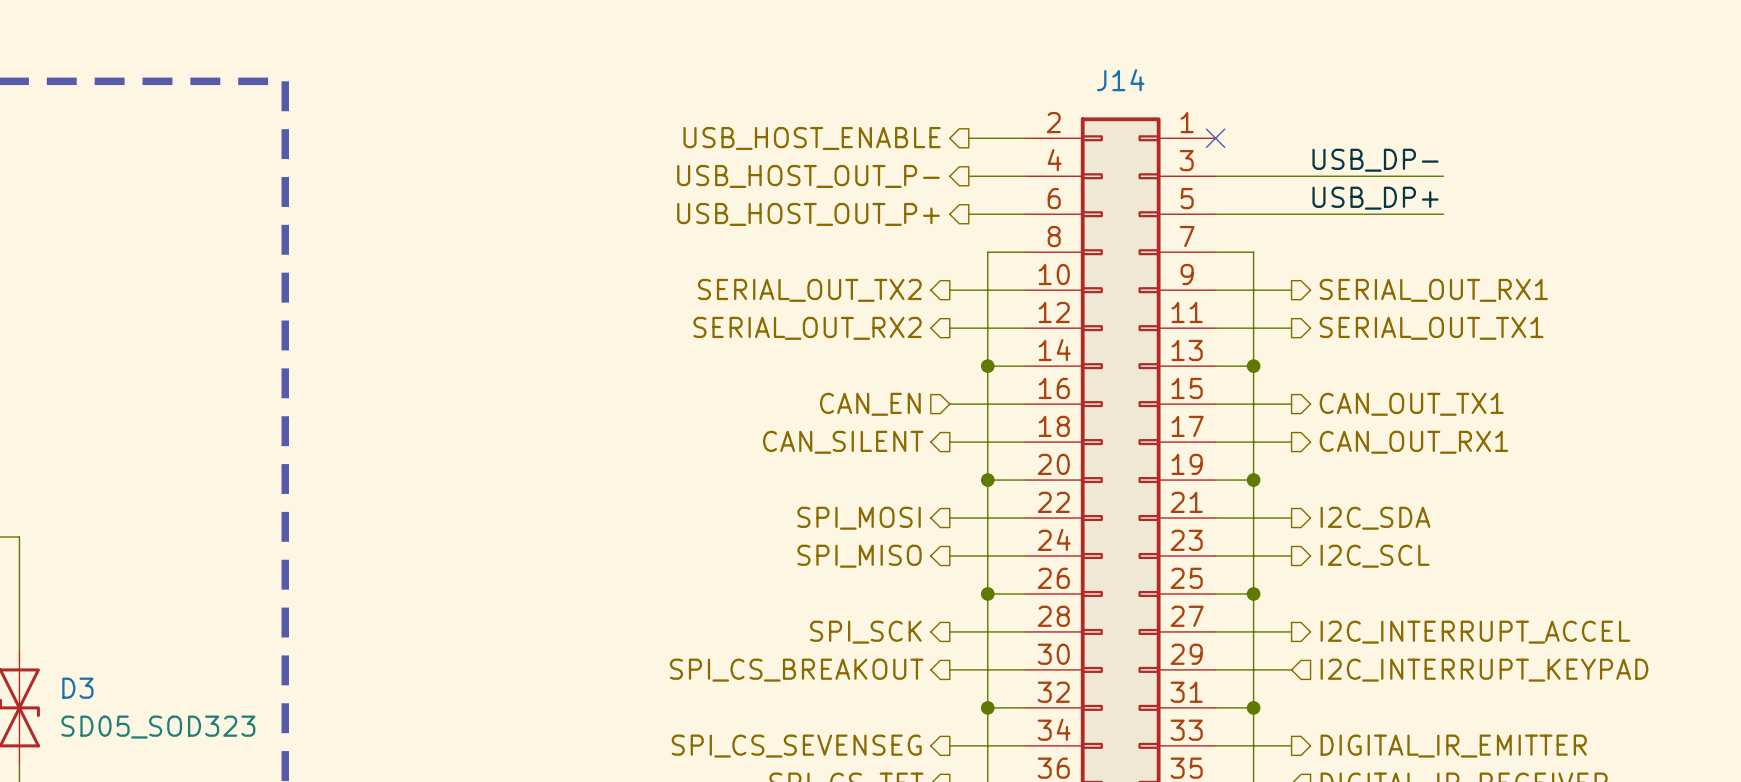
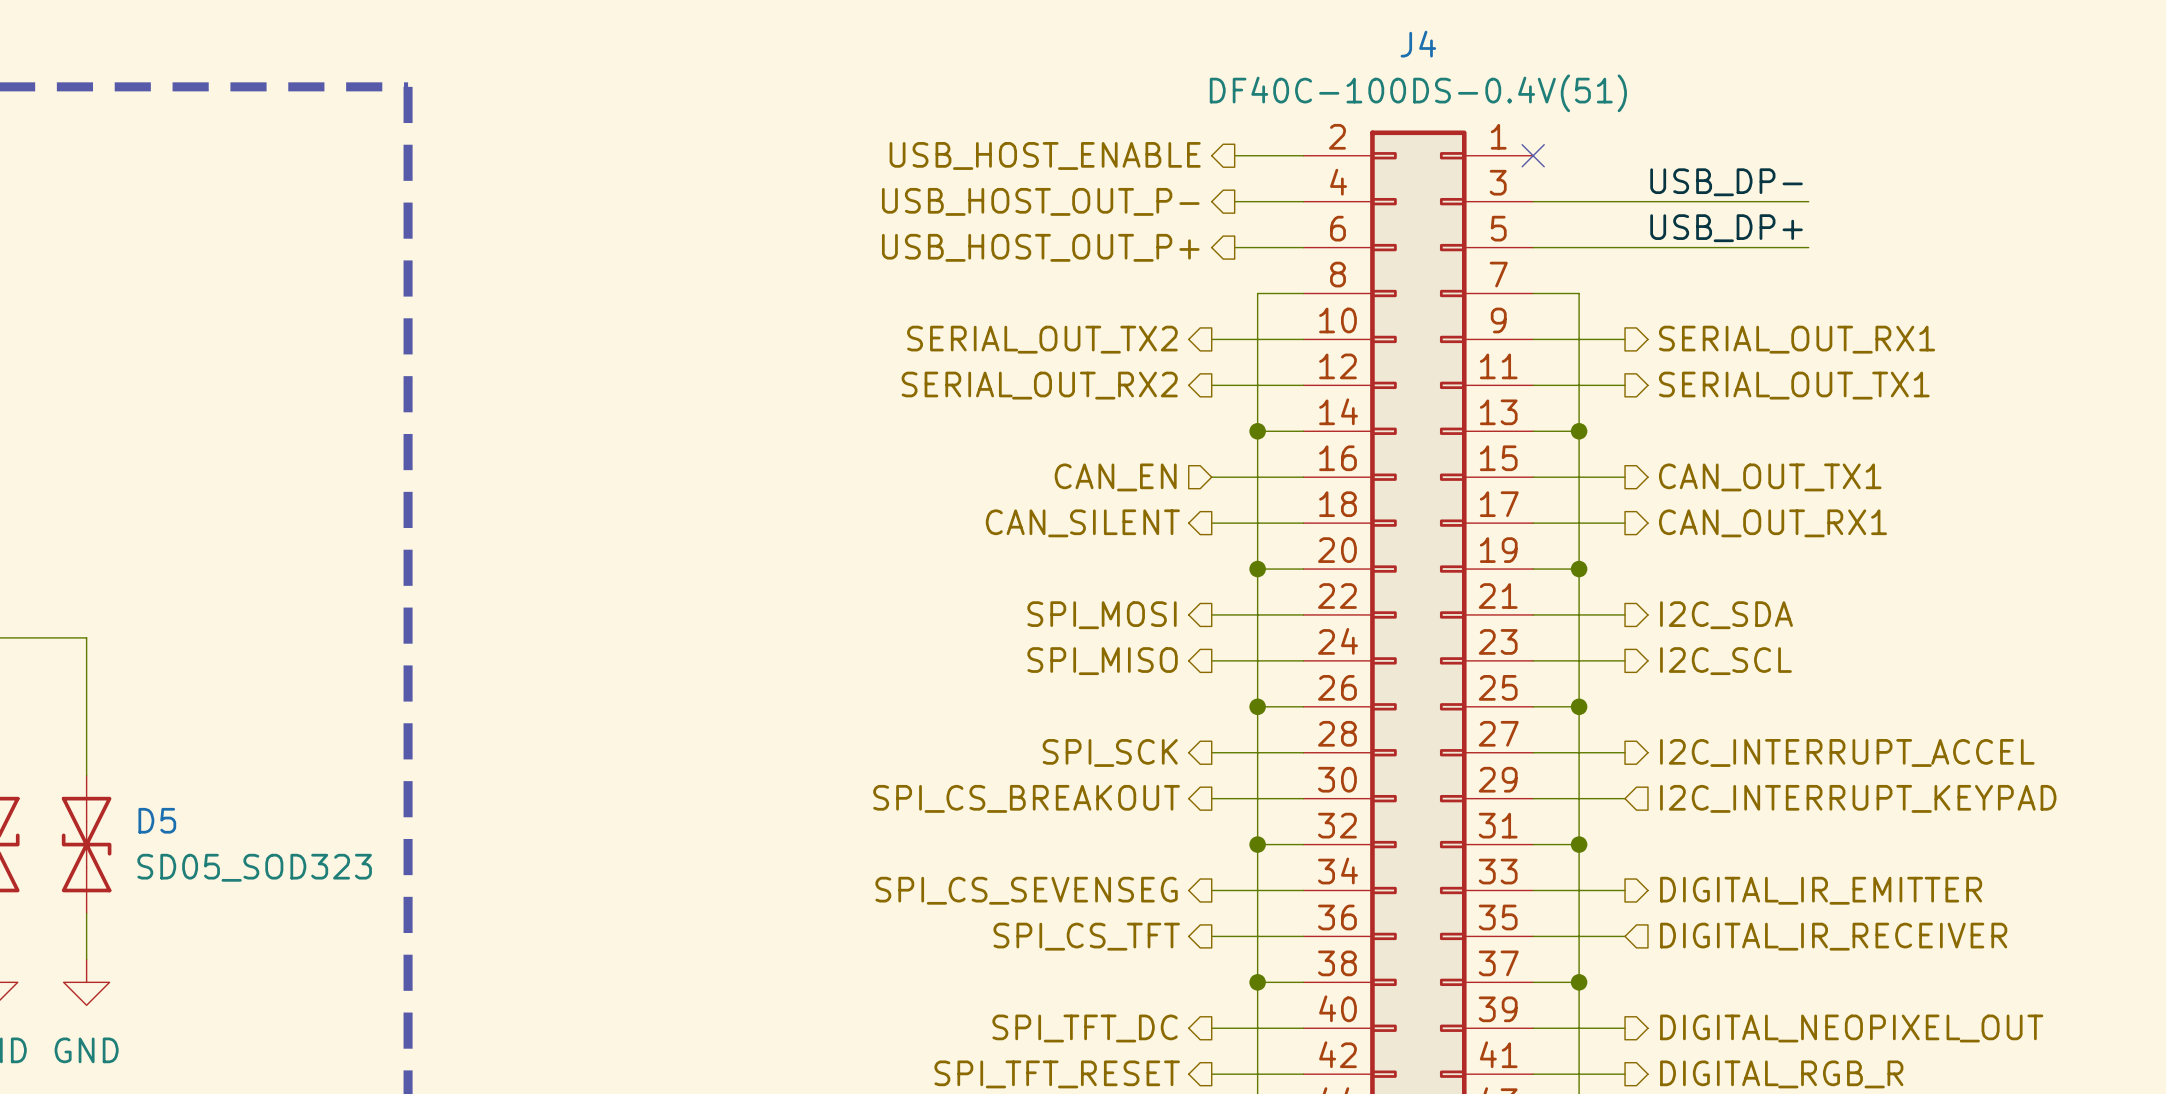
J14 name: J14 (1120, 80) -> J4 (1418, 44)
J14 value: none -> DF40C-100DS-0.4V(51) (1418, 93)
D3 name: D3 (77, 688) -> D5 (157, 820)

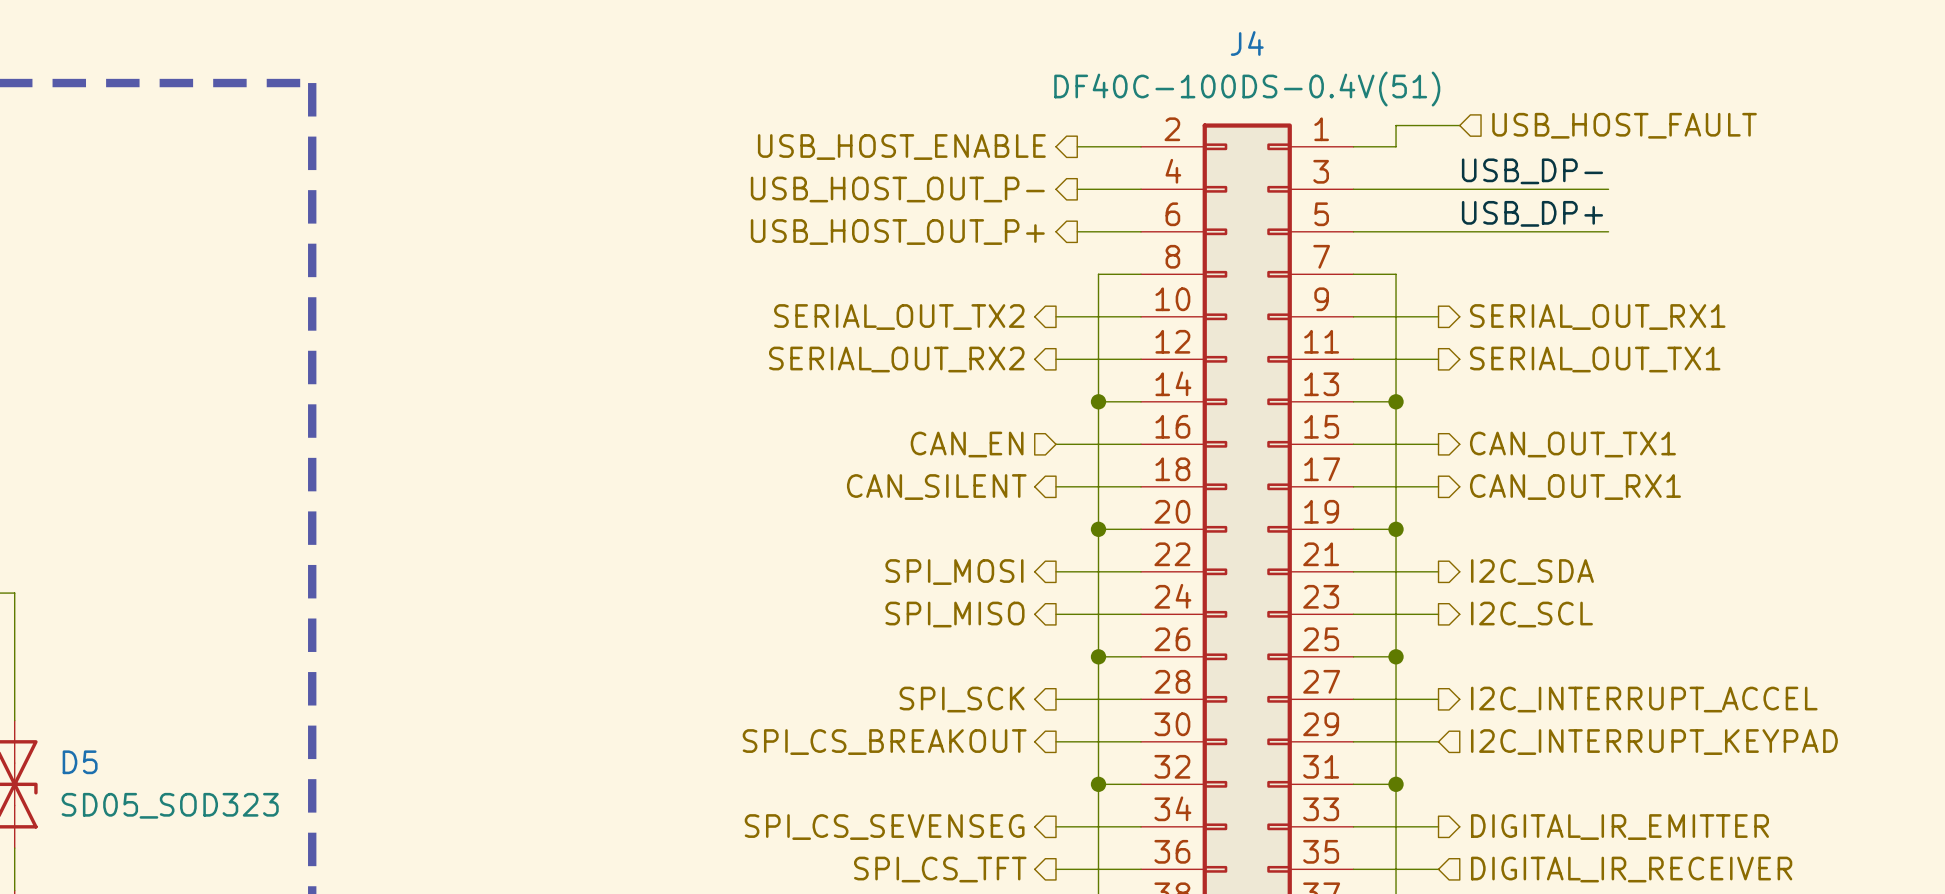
wire: none -> (1459, 125) (1396, 125) (1396, 146) (1353, 146)
hierarchical label: none -> USB_HOST_FAULT (1624, 125)
no-connect mark: (1533, 155) -> none

